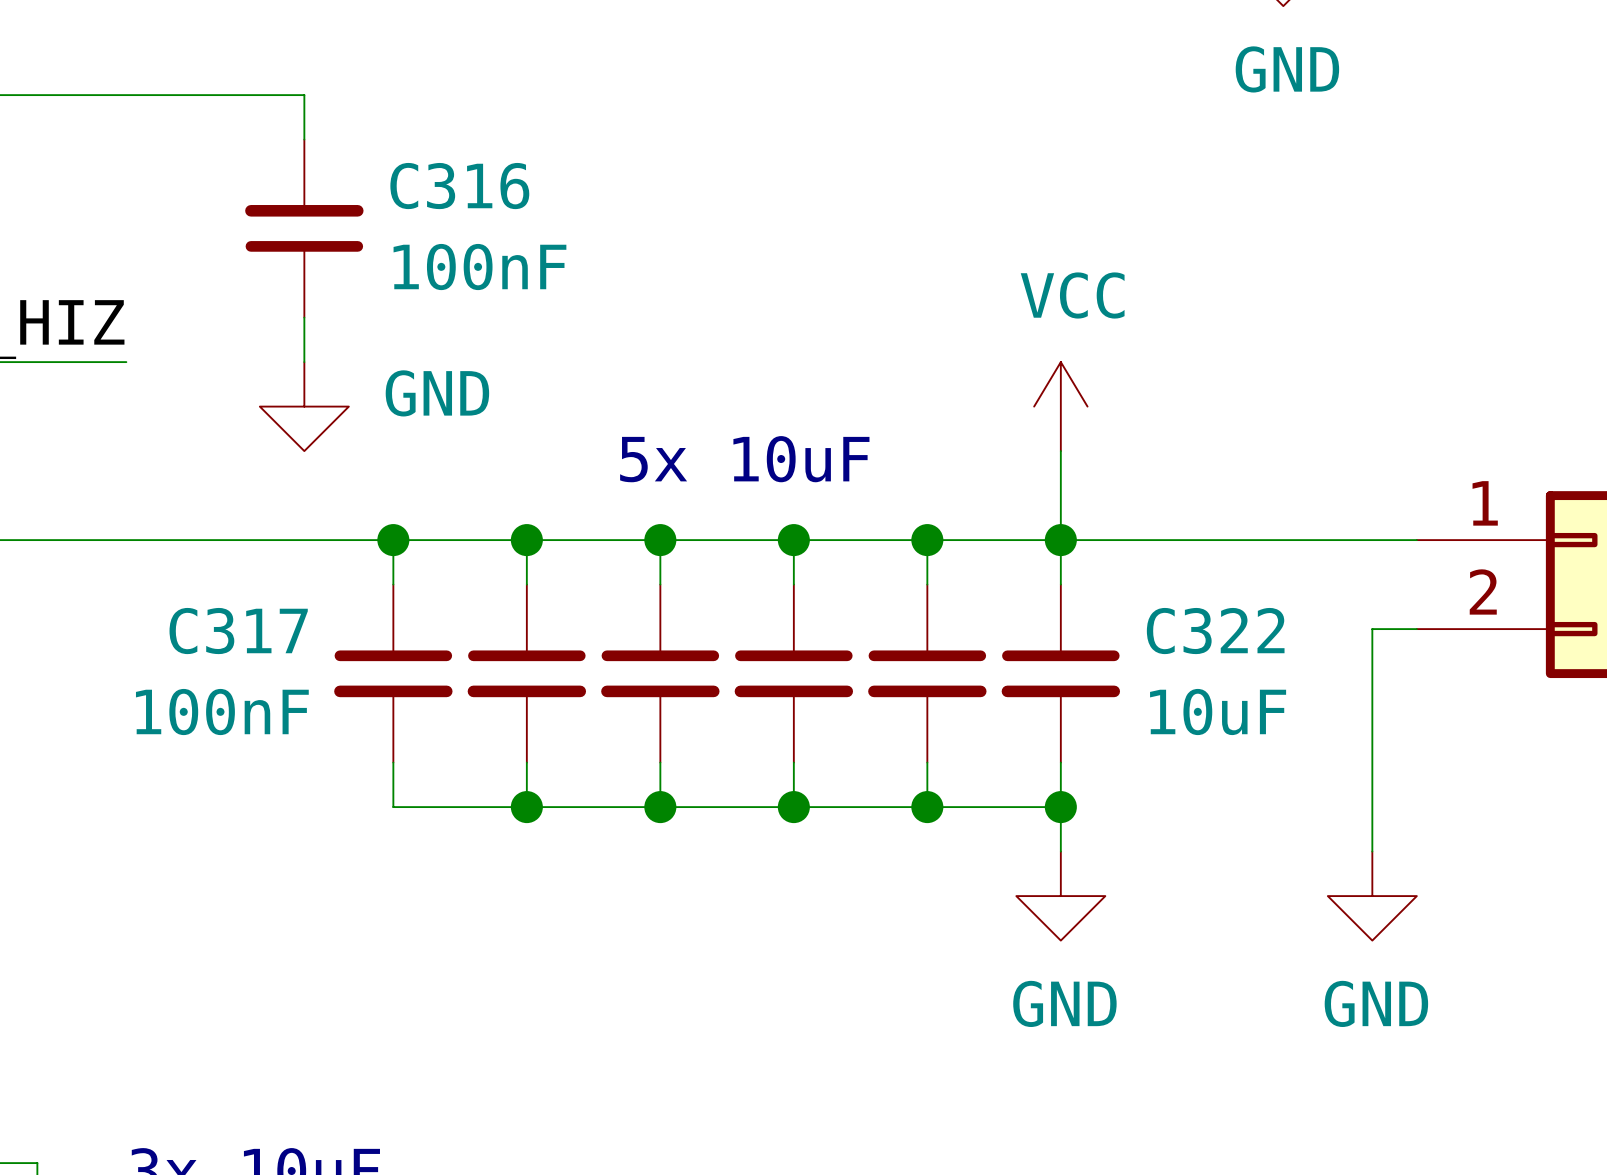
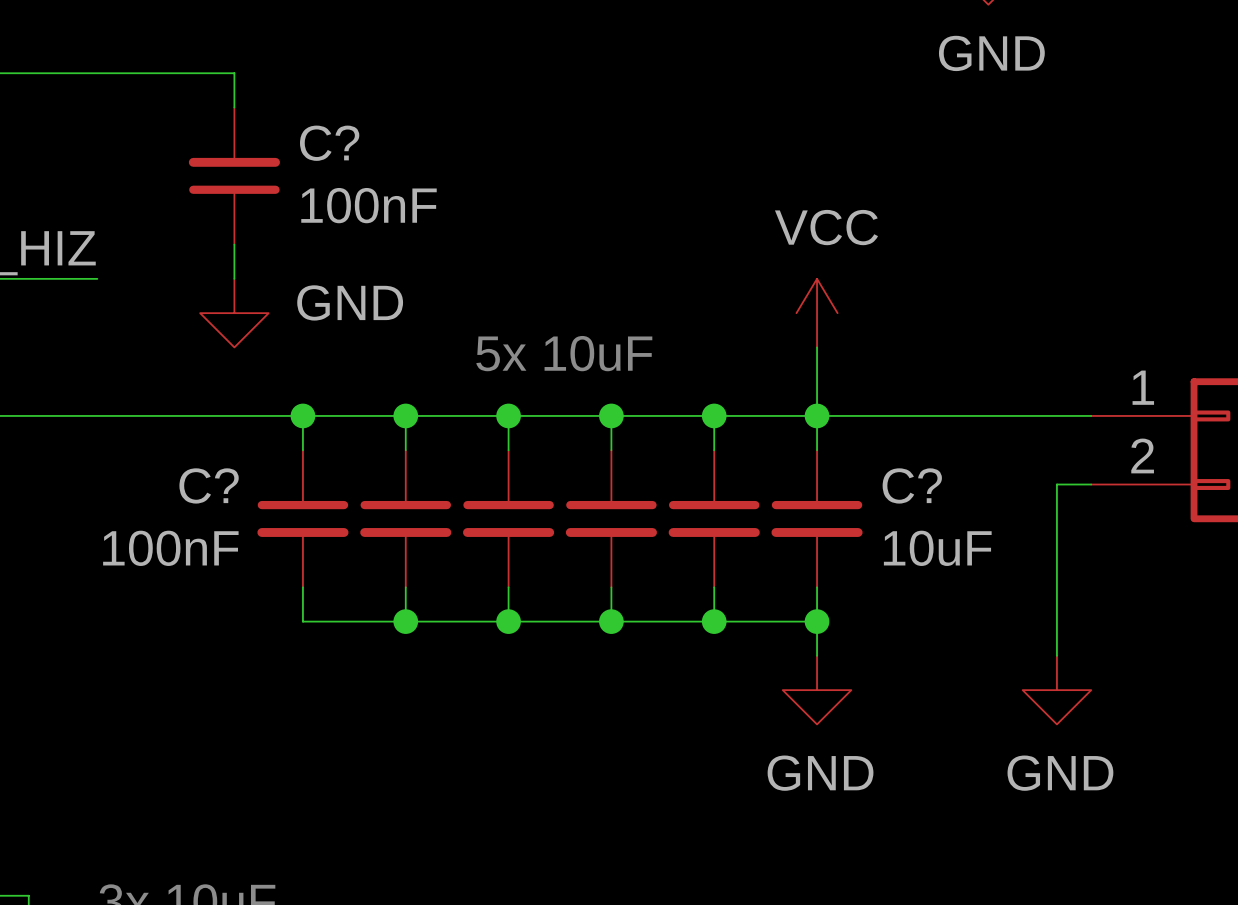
C316 name: C316 (459, 186) -> C? (329, 143)
C317 name: C317 (238, 631) -> C? (209, 485)
C322 name: C322 (1215, 631) -> C? (912, 485)

